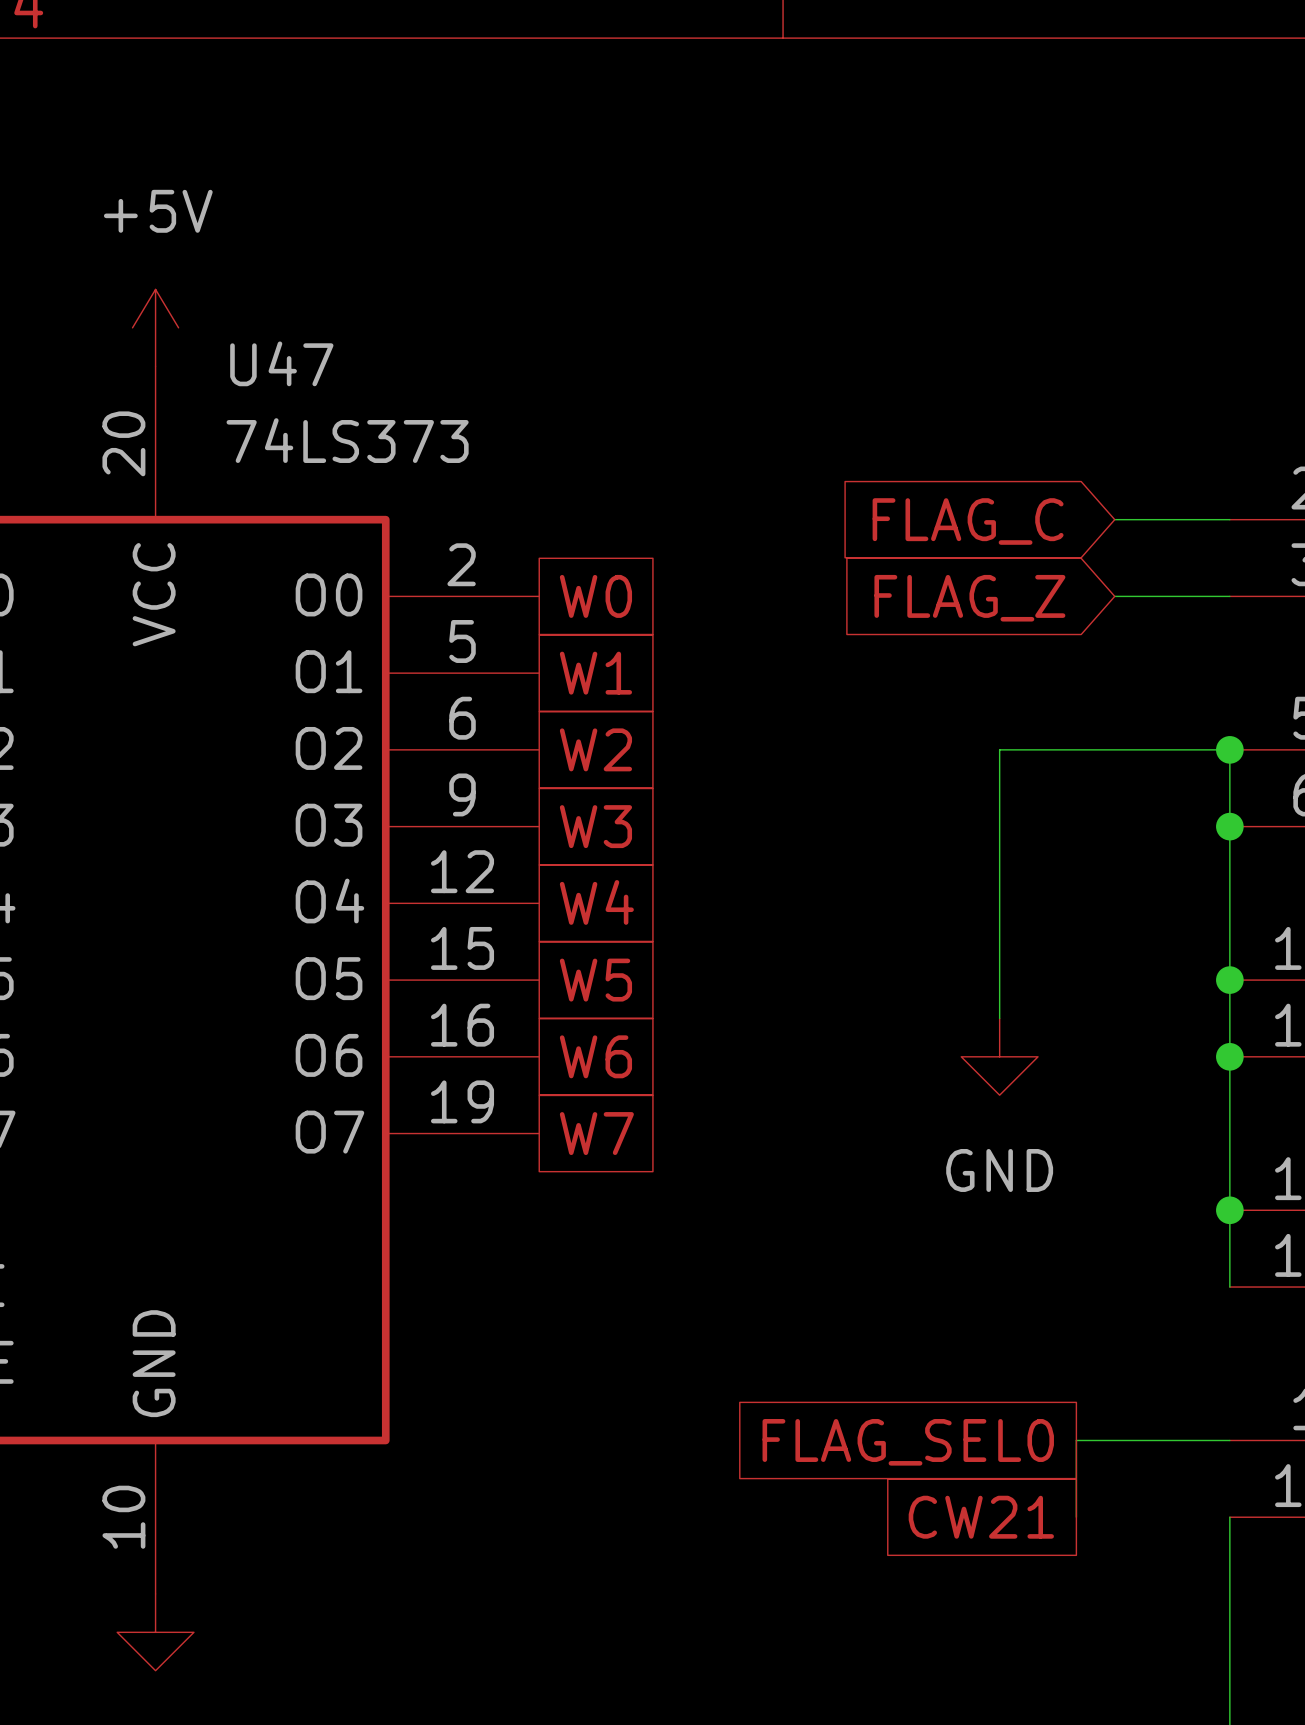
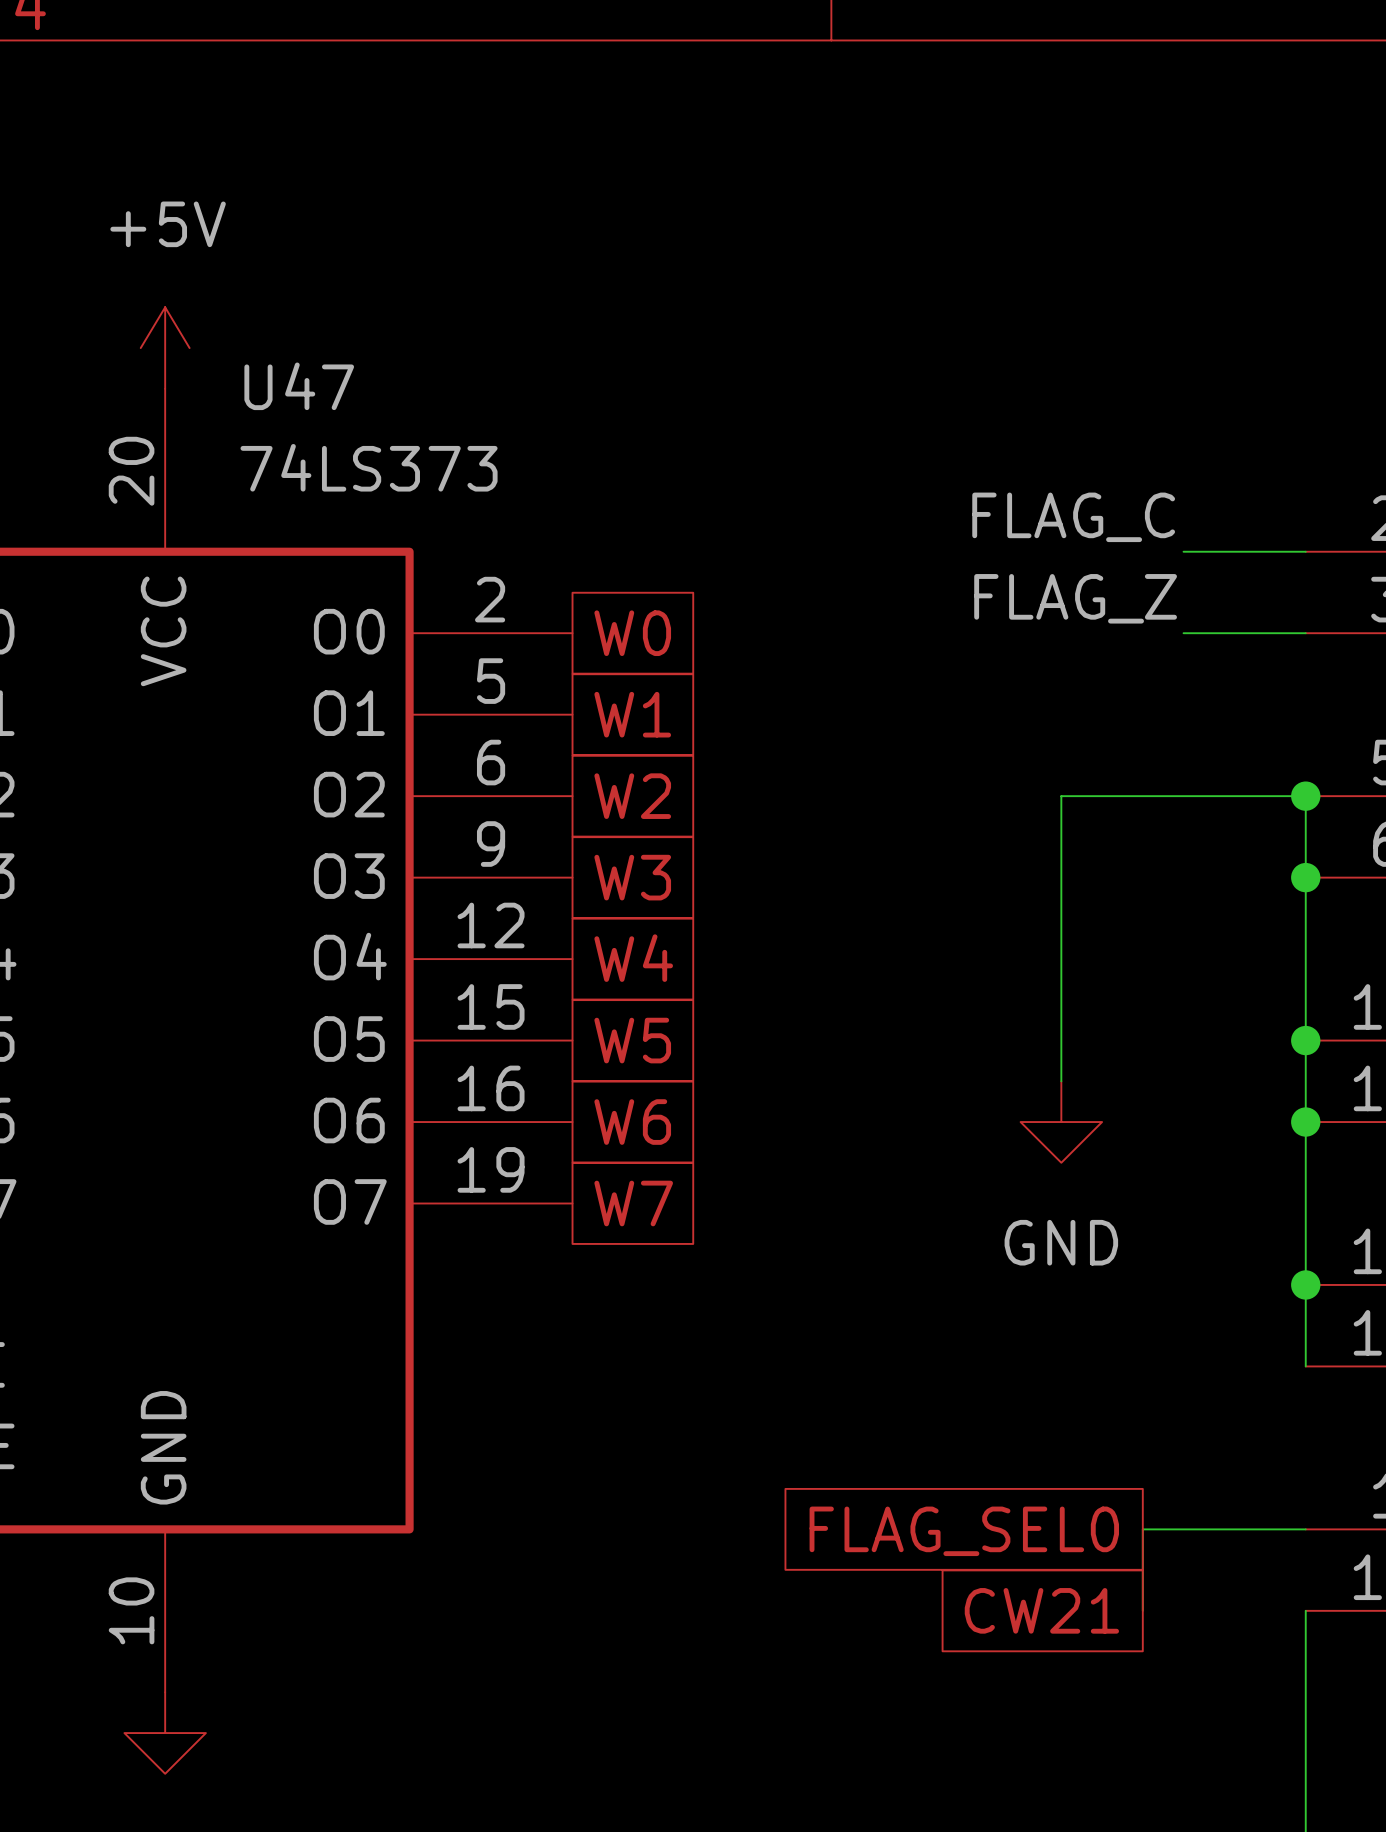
label: none -> FLAG_C (1073, 517)
global label: FLAG_C (968, 521) -> none
label: none -> FLAG_Z (1075, 598)
global label: FLAG_Z (969, 598) -> none

